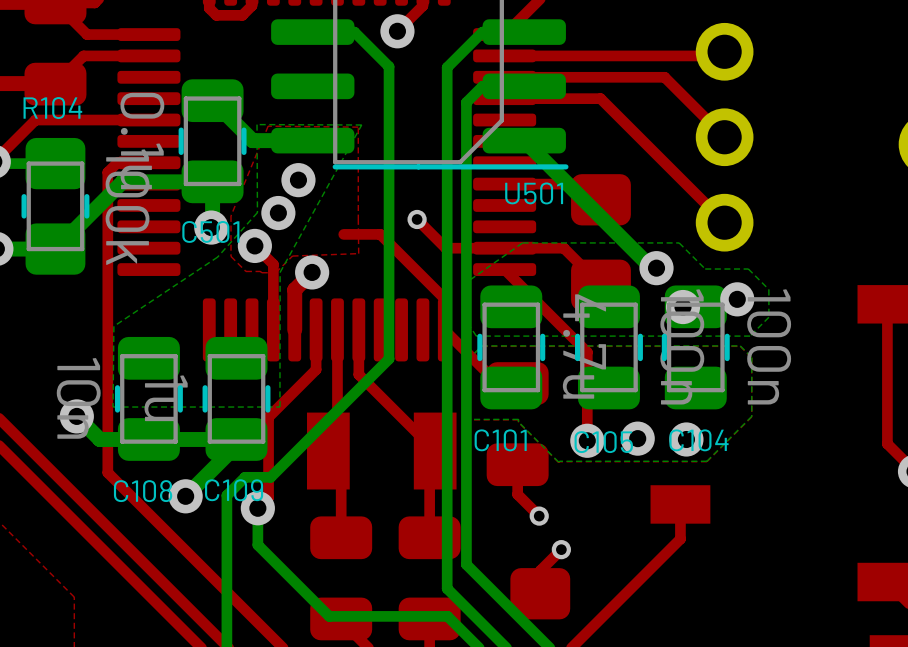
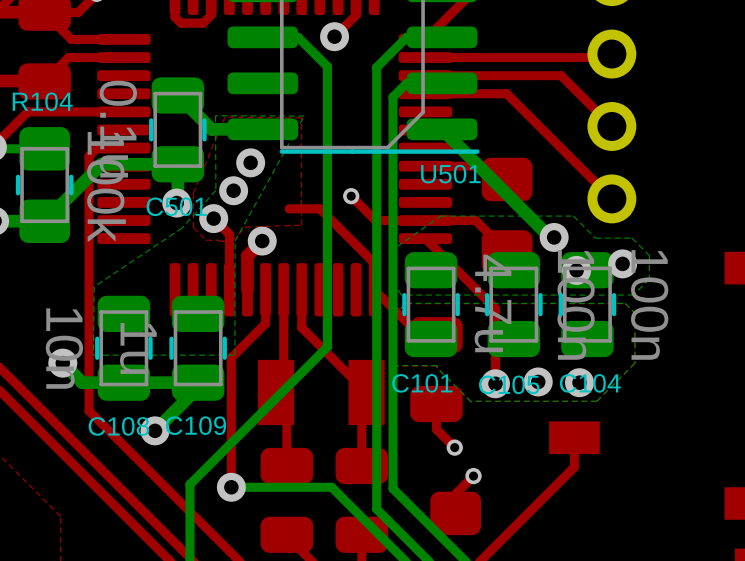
bottom track: (389, 358) (270, 477) (245, 477) (226, 495) (226, 559) -> (327, 314) (327, 346) (189, 484)
top track: (275, 410) (268, 417) (268, 497) (257, 508) -> (231, 357) (231, 487)
bottom track: (257, 508) (257, 545) (329, 616) (447, 616) -> (231, 487) (331, 487) (377, 532)
via position: (257, 508) -> (231, 487)

